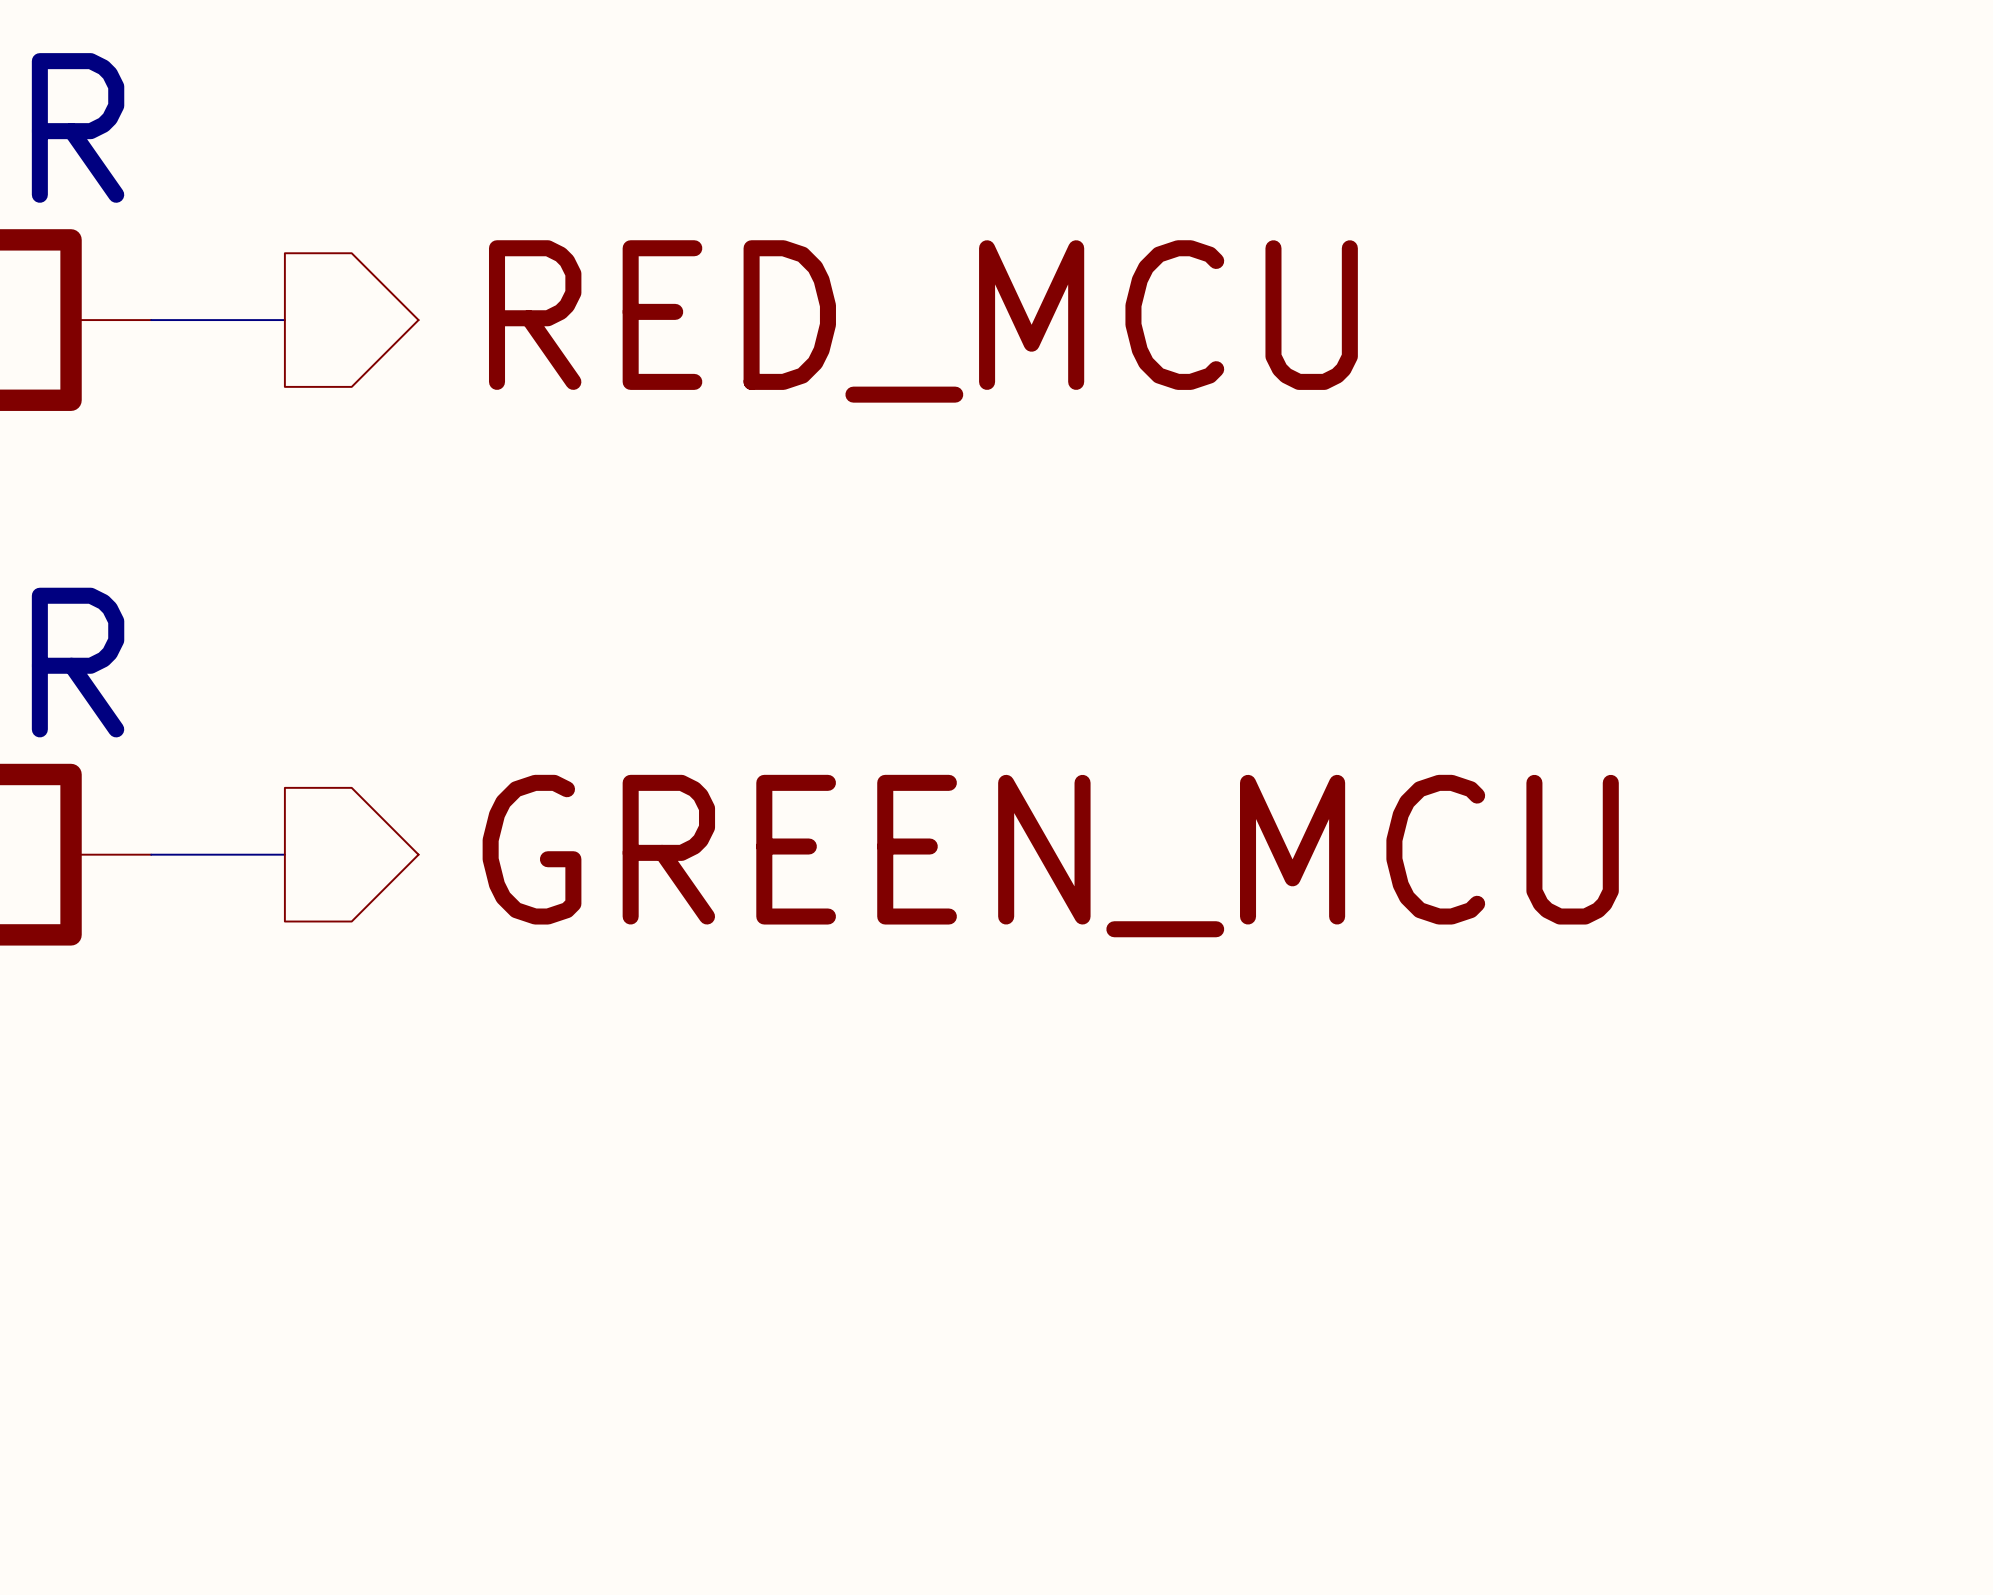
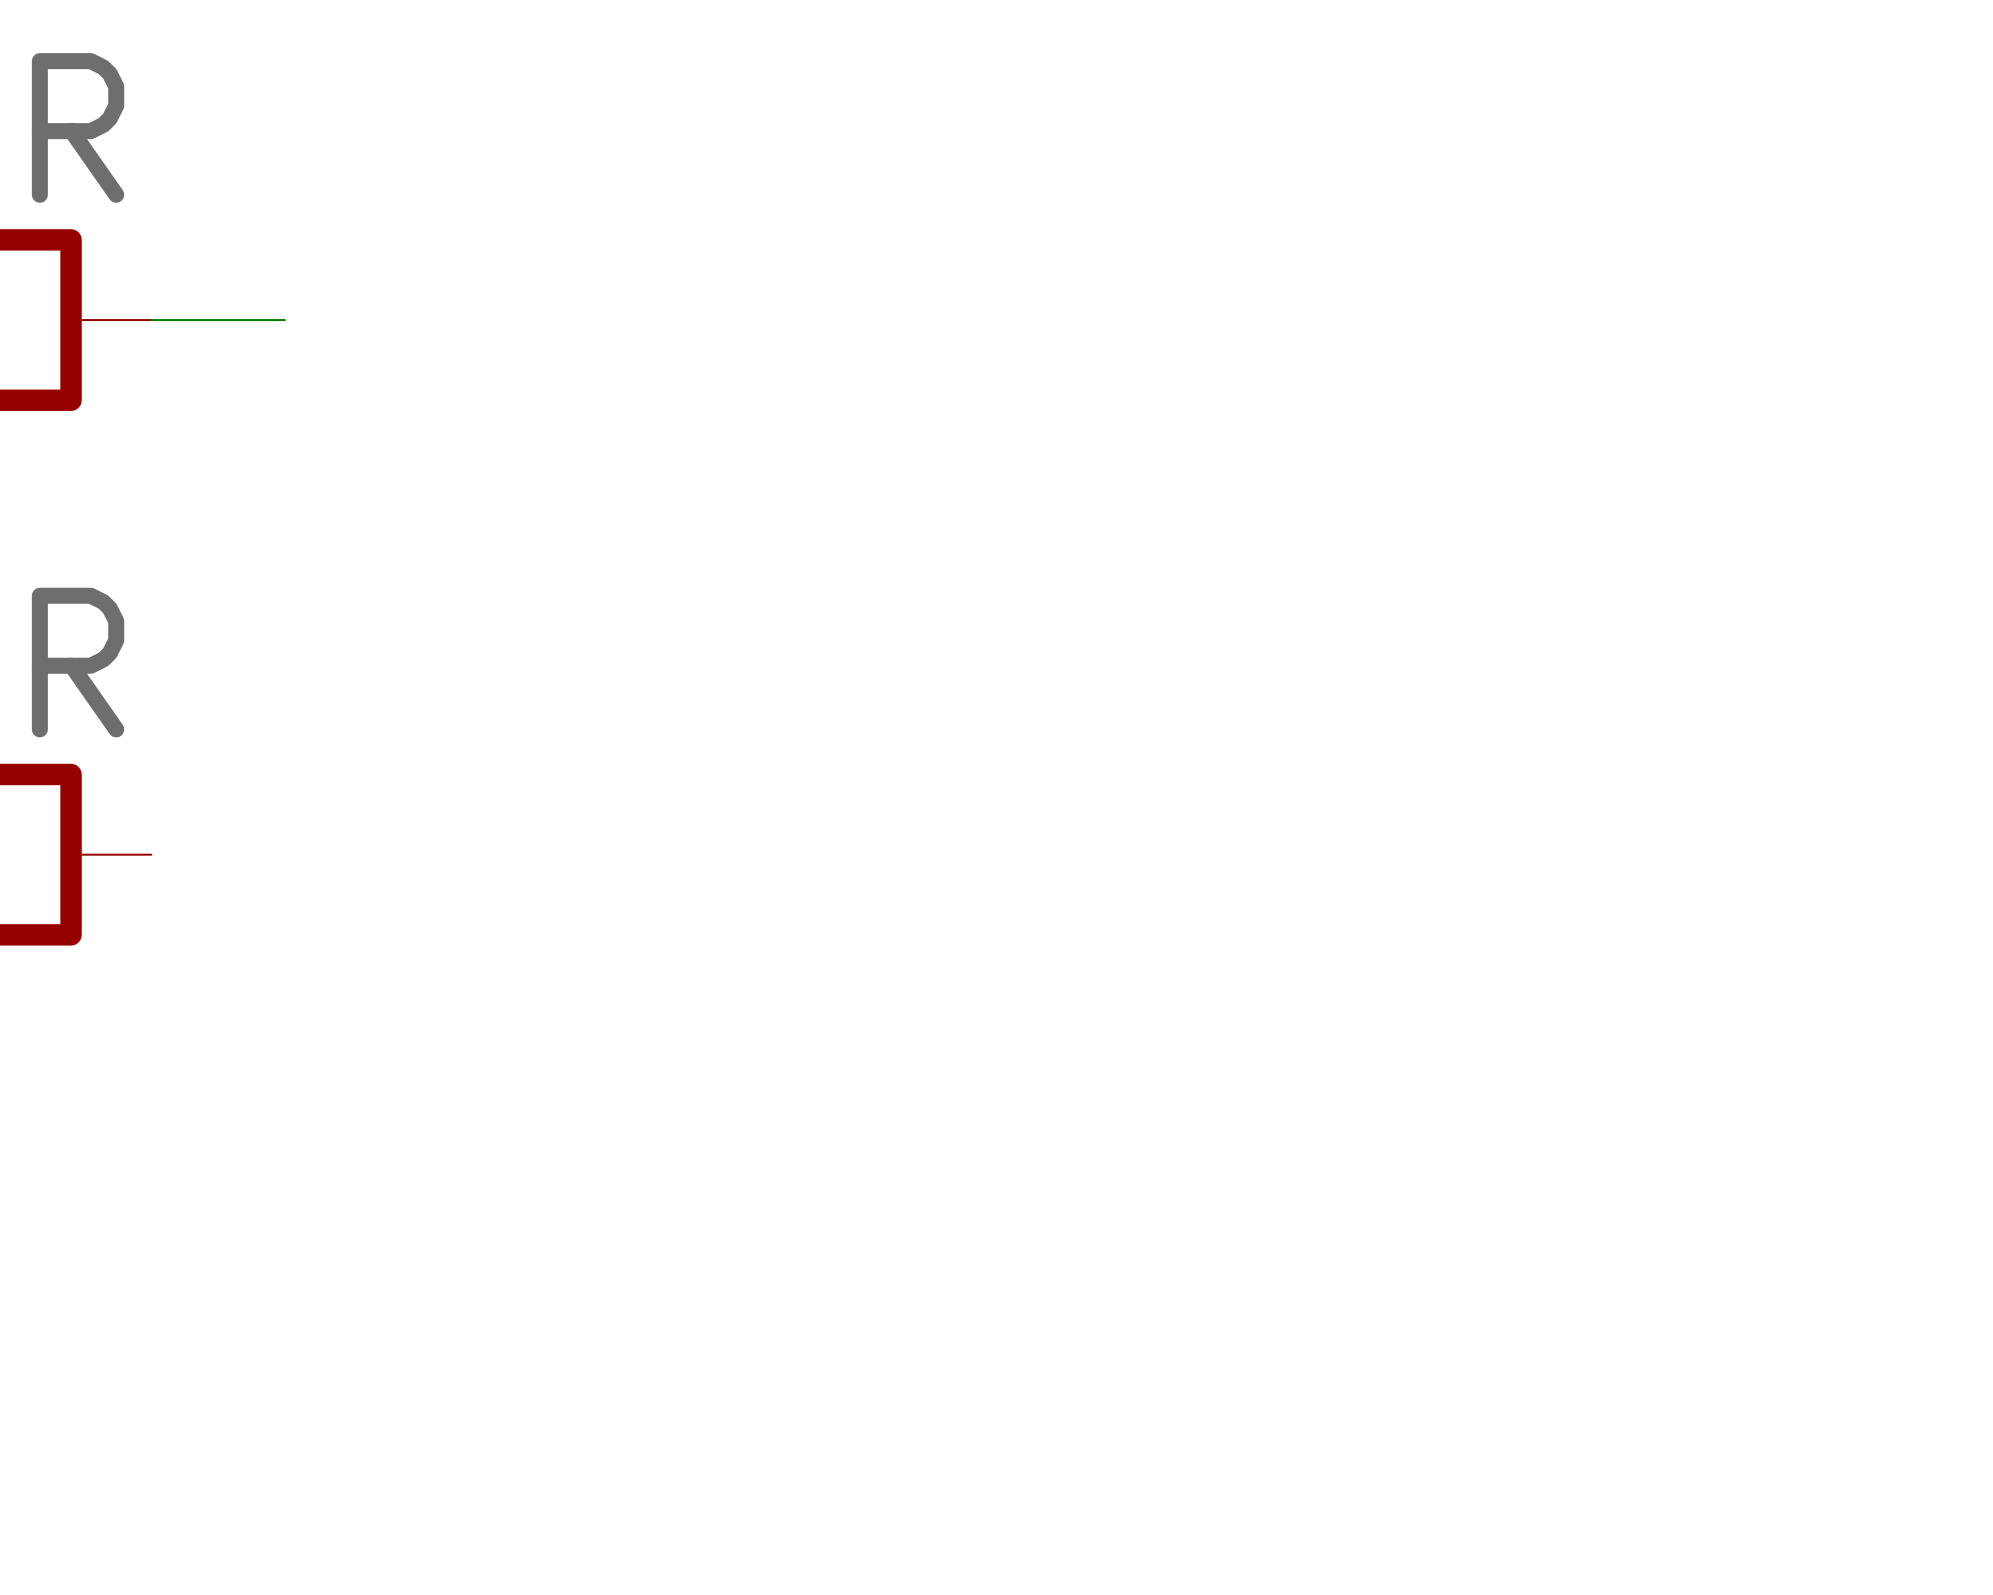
hierarchical label: RED_MCU (923, 321) -> none
wire: (151, 854) (284, 854) -> none
hierarchical label: GREEN_MCU (1050, 856) -> none

